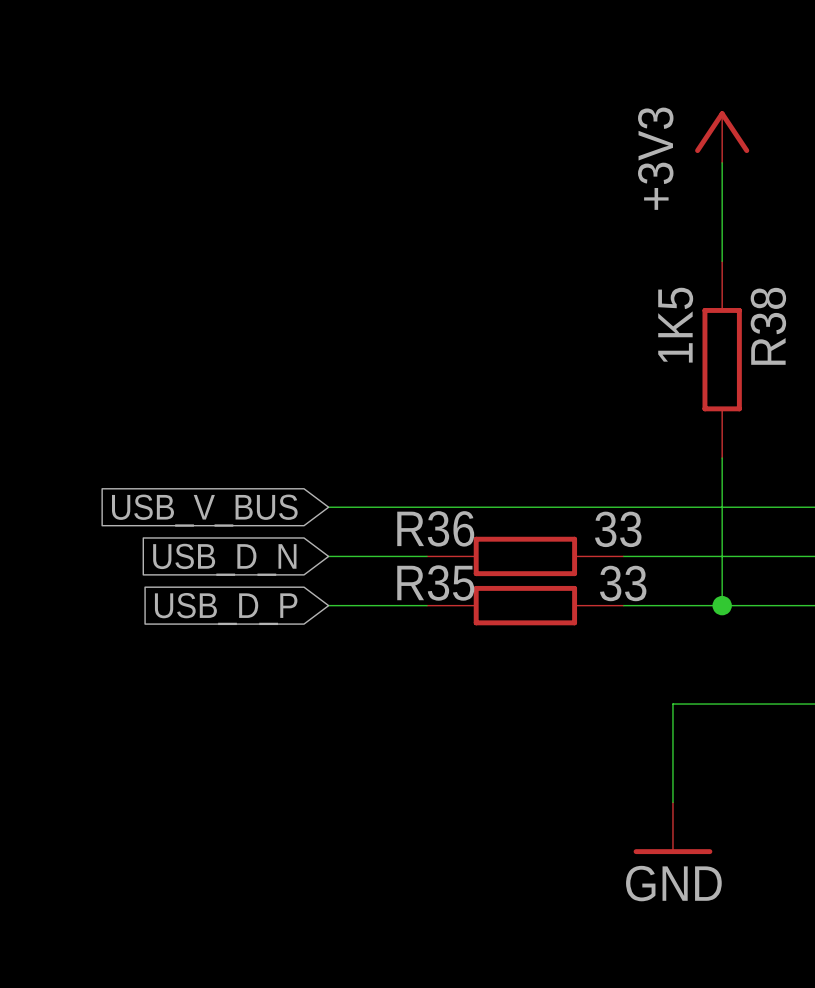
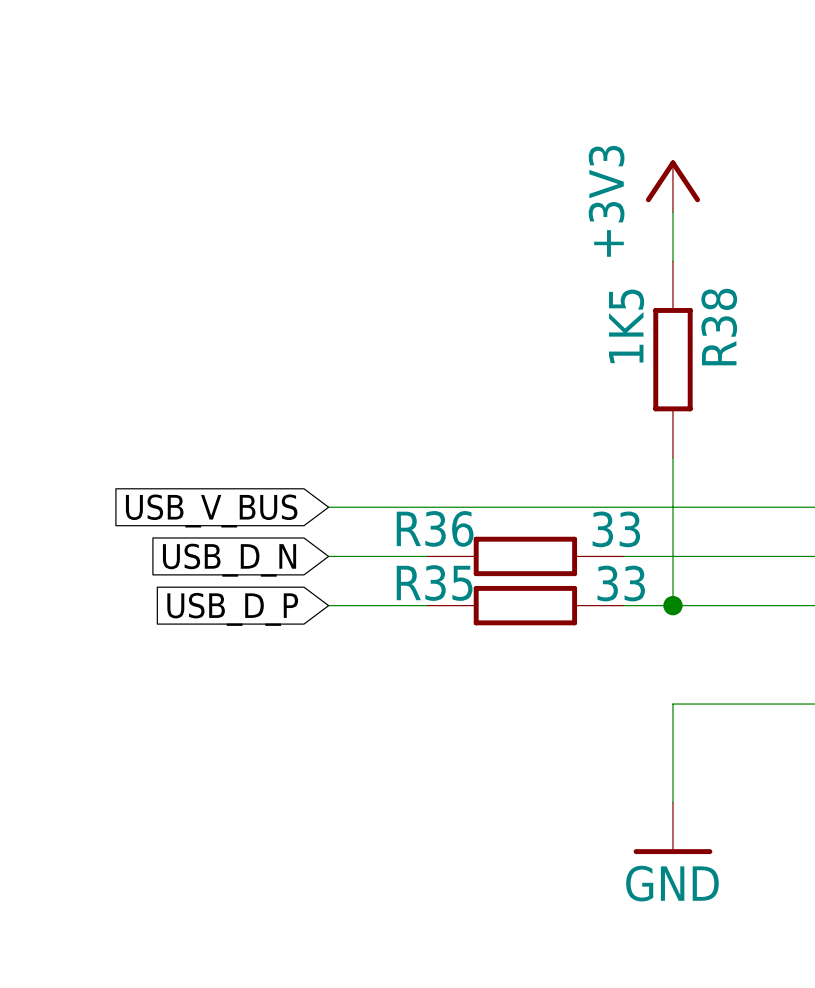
power symbol position: +3V3 (722, 137) -> +3V3 (672, 186)
wire: (722, 162) (722, 261) -> none
wire: none -> (672, 212) (672, 261)
R38 position: (722, 359) -> (672, 359)
wire: (722, 458) (722, 605) -> (672, 458) (672, 605)
junction position: (722, 605) -> (672, 605)

